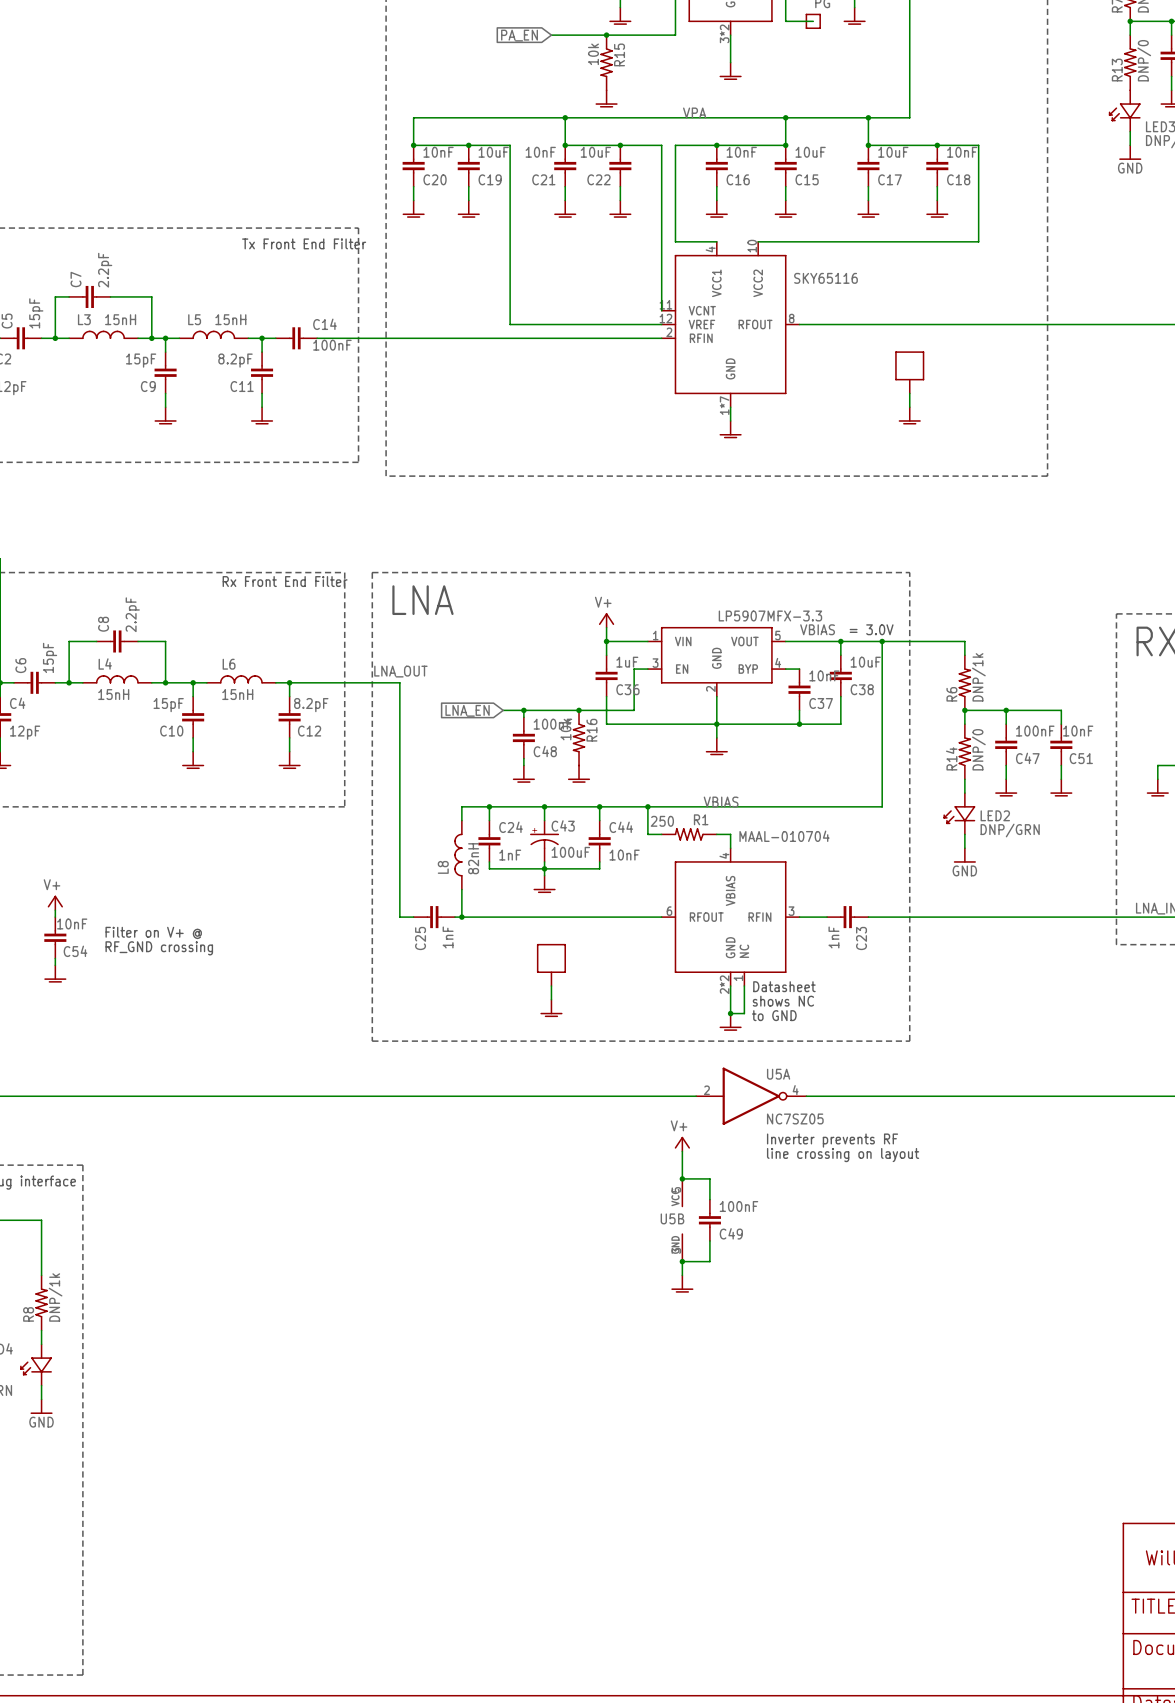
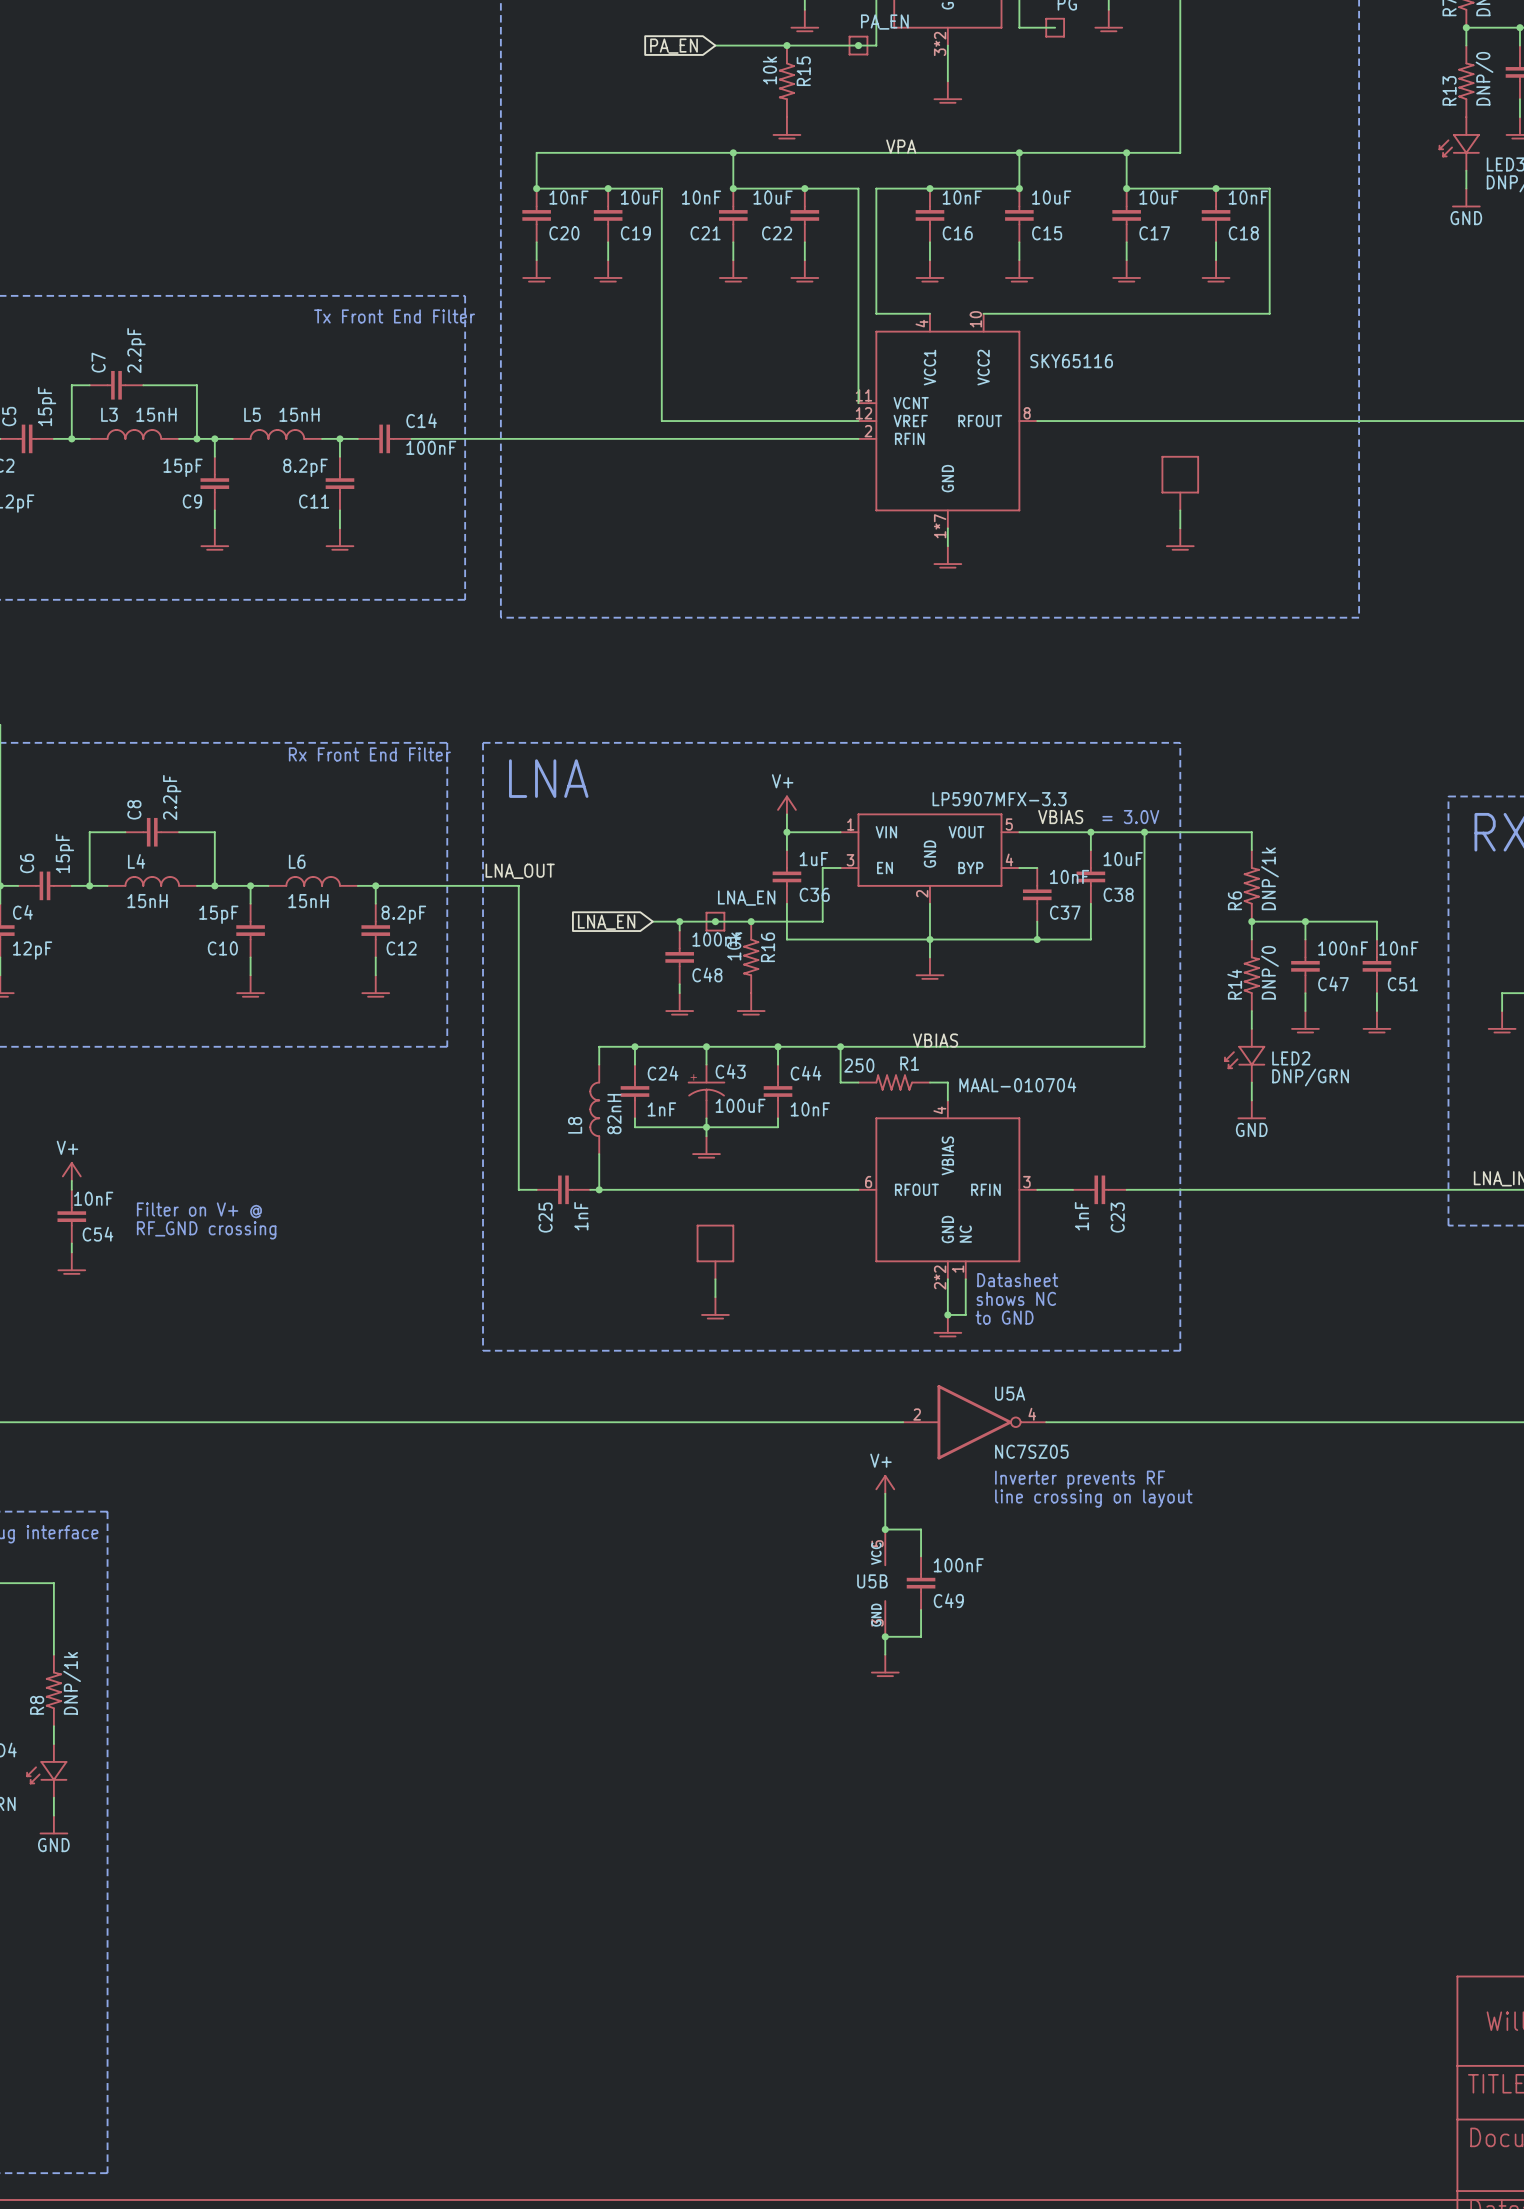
PA_EN: none -> (858, 45)
junction: none -> (858, 45)
LNA_EN: none -> (715, 921)
junction: none -> (715, 921)

